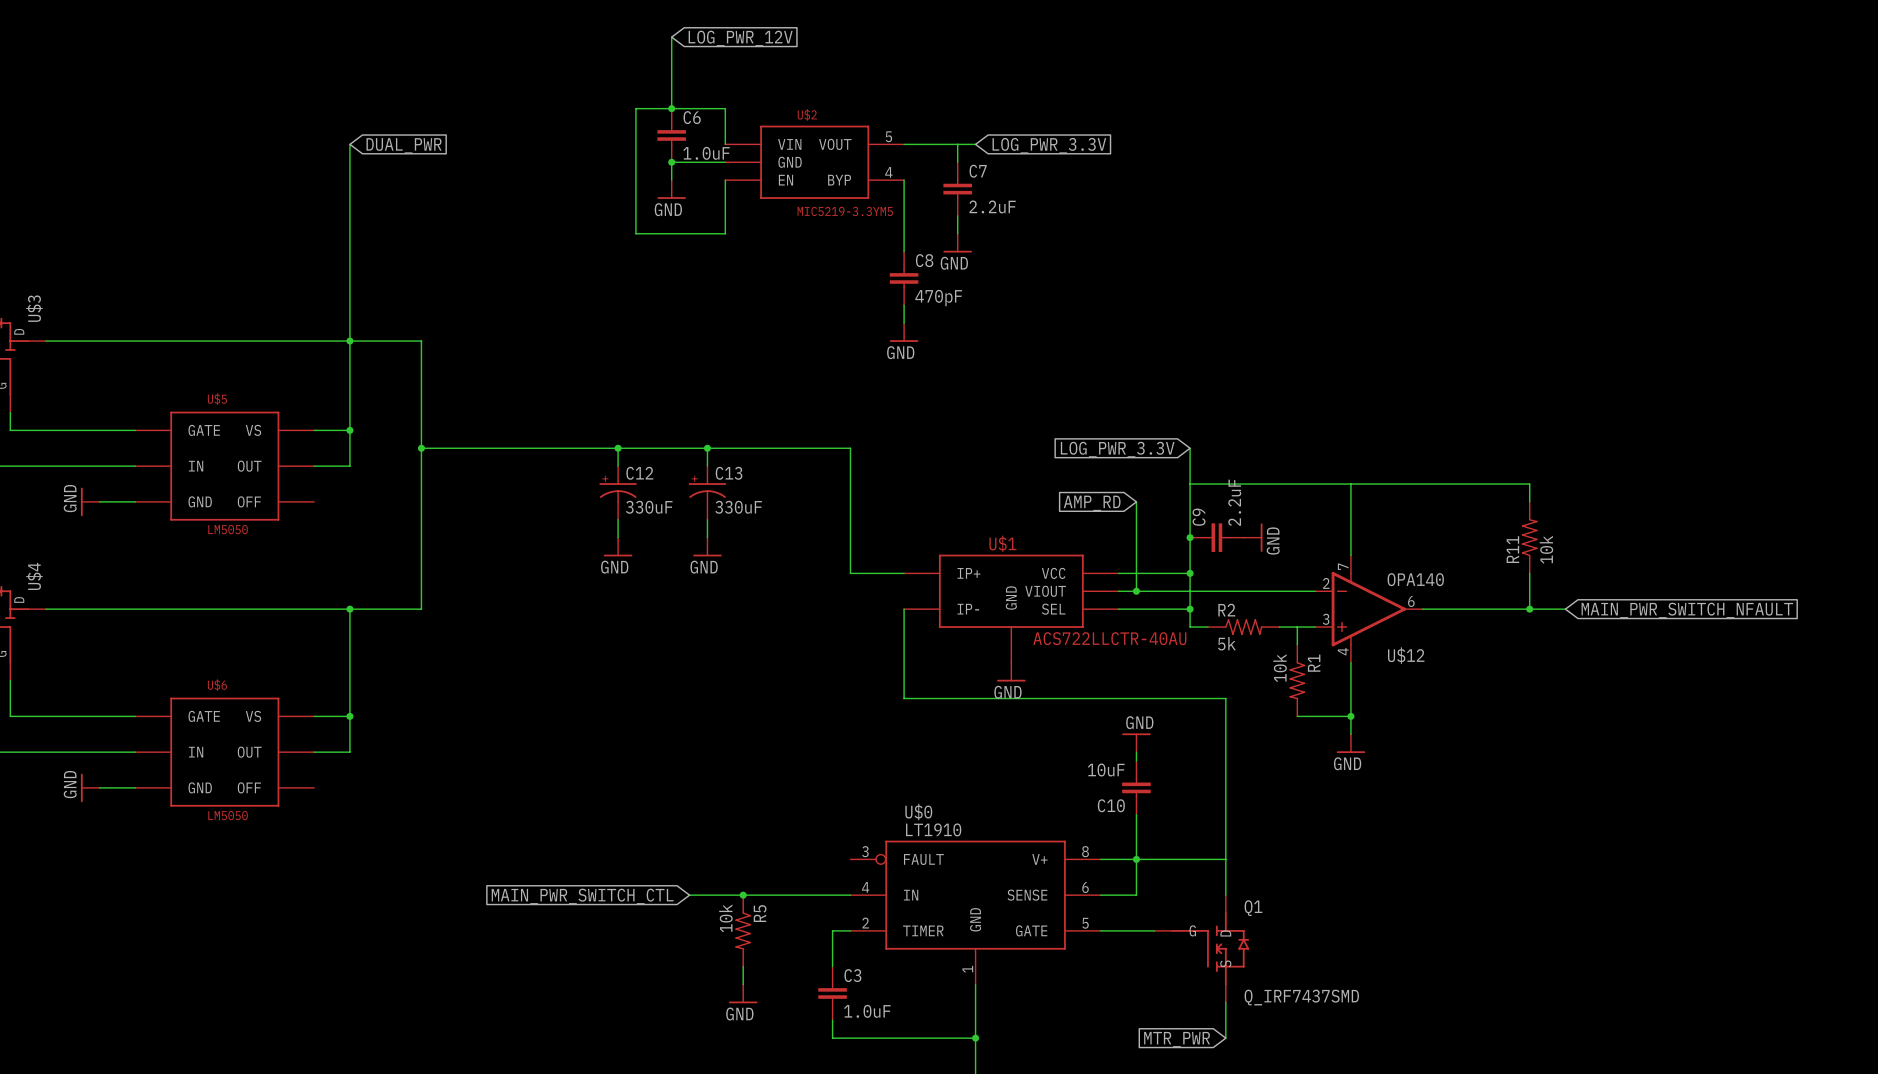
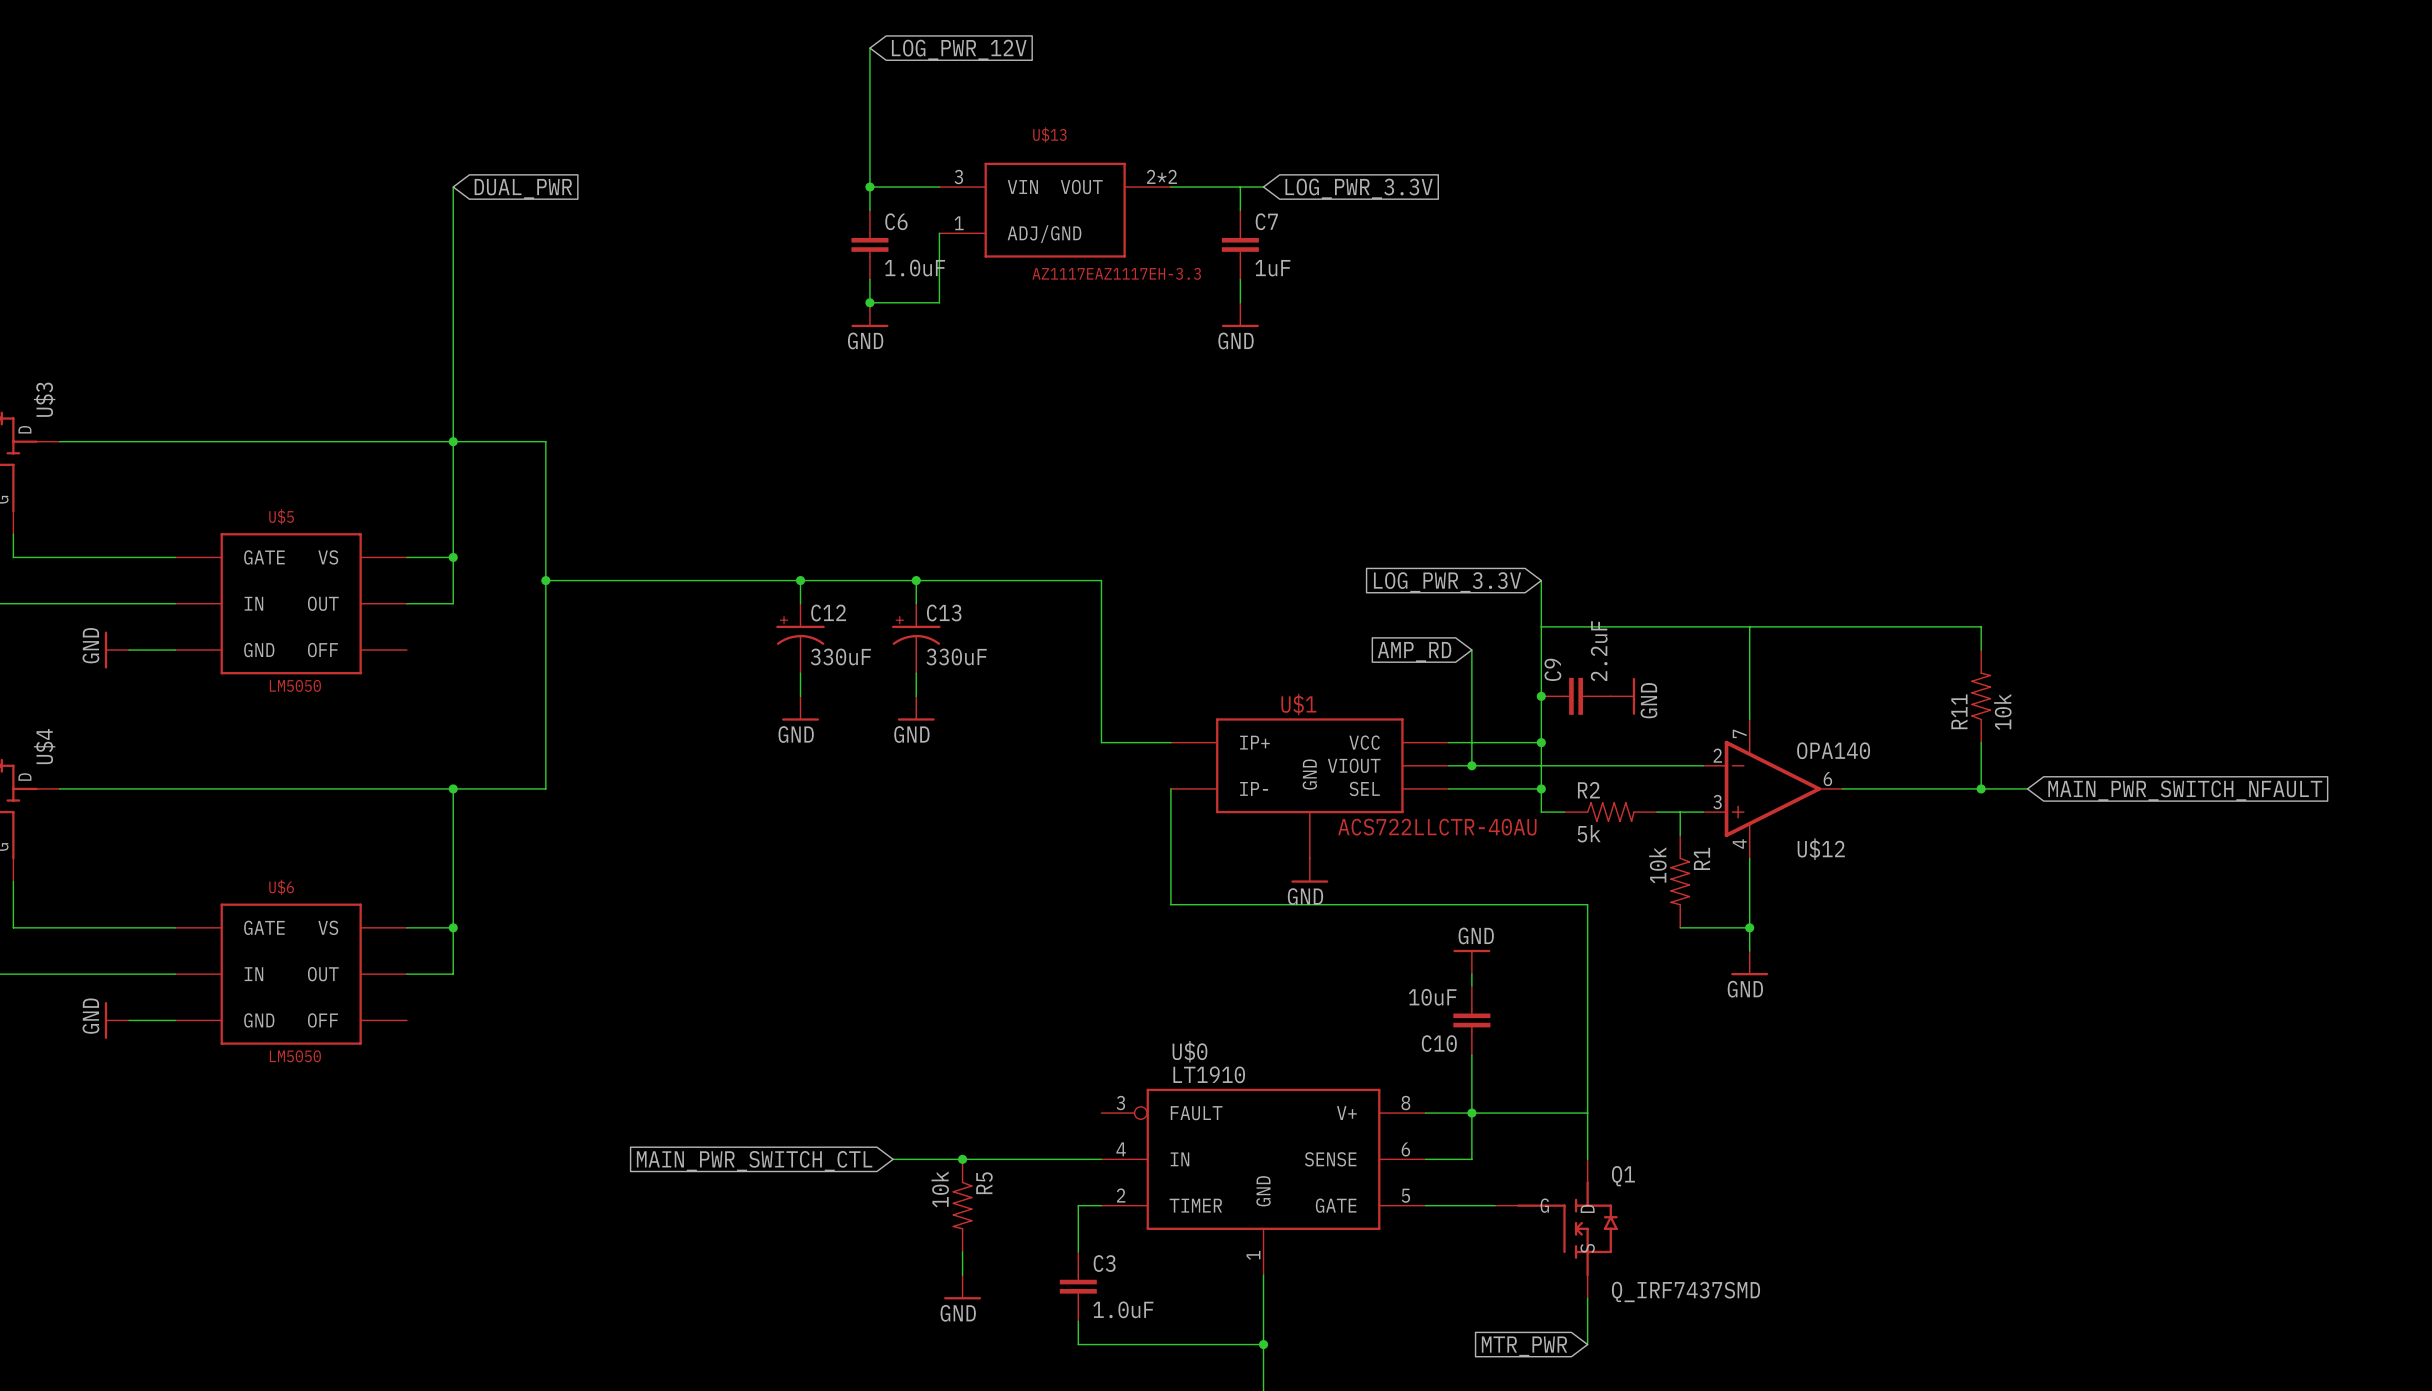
junction: (671, 108) -> none
C6 position: (671, 135) -> (869, 244)
junction: none -> (869, 187)
wire: (725, 144) (725, 108) (635, 108) (635, 233) (671, 233) -> (939, 187) (869, 187)
junction: (671, 162) -> none
wire: (725, 162) (671, 162) (671, 180) -> none
U$2: MIC5219-3.3YM5 (814, 162) -> none
U$13: none -> AZ1117EAZ1117EH-3.3 (1055, 210)
wire: (904, 180) (904, 251) -> none
power symbol position: GND (671, 189) -> GND (869, 314)
C7 value: 2.2uF (992, 206) -> 1uF (1272, 268)
wire: none -> (869, 279) (869, 302)
junction: none -> (869, 302)
C8: 470pF (904, 278) -> none
wire: (904, 305) (904, 323) -> none
power symbol: GND (904, 332) -> none

